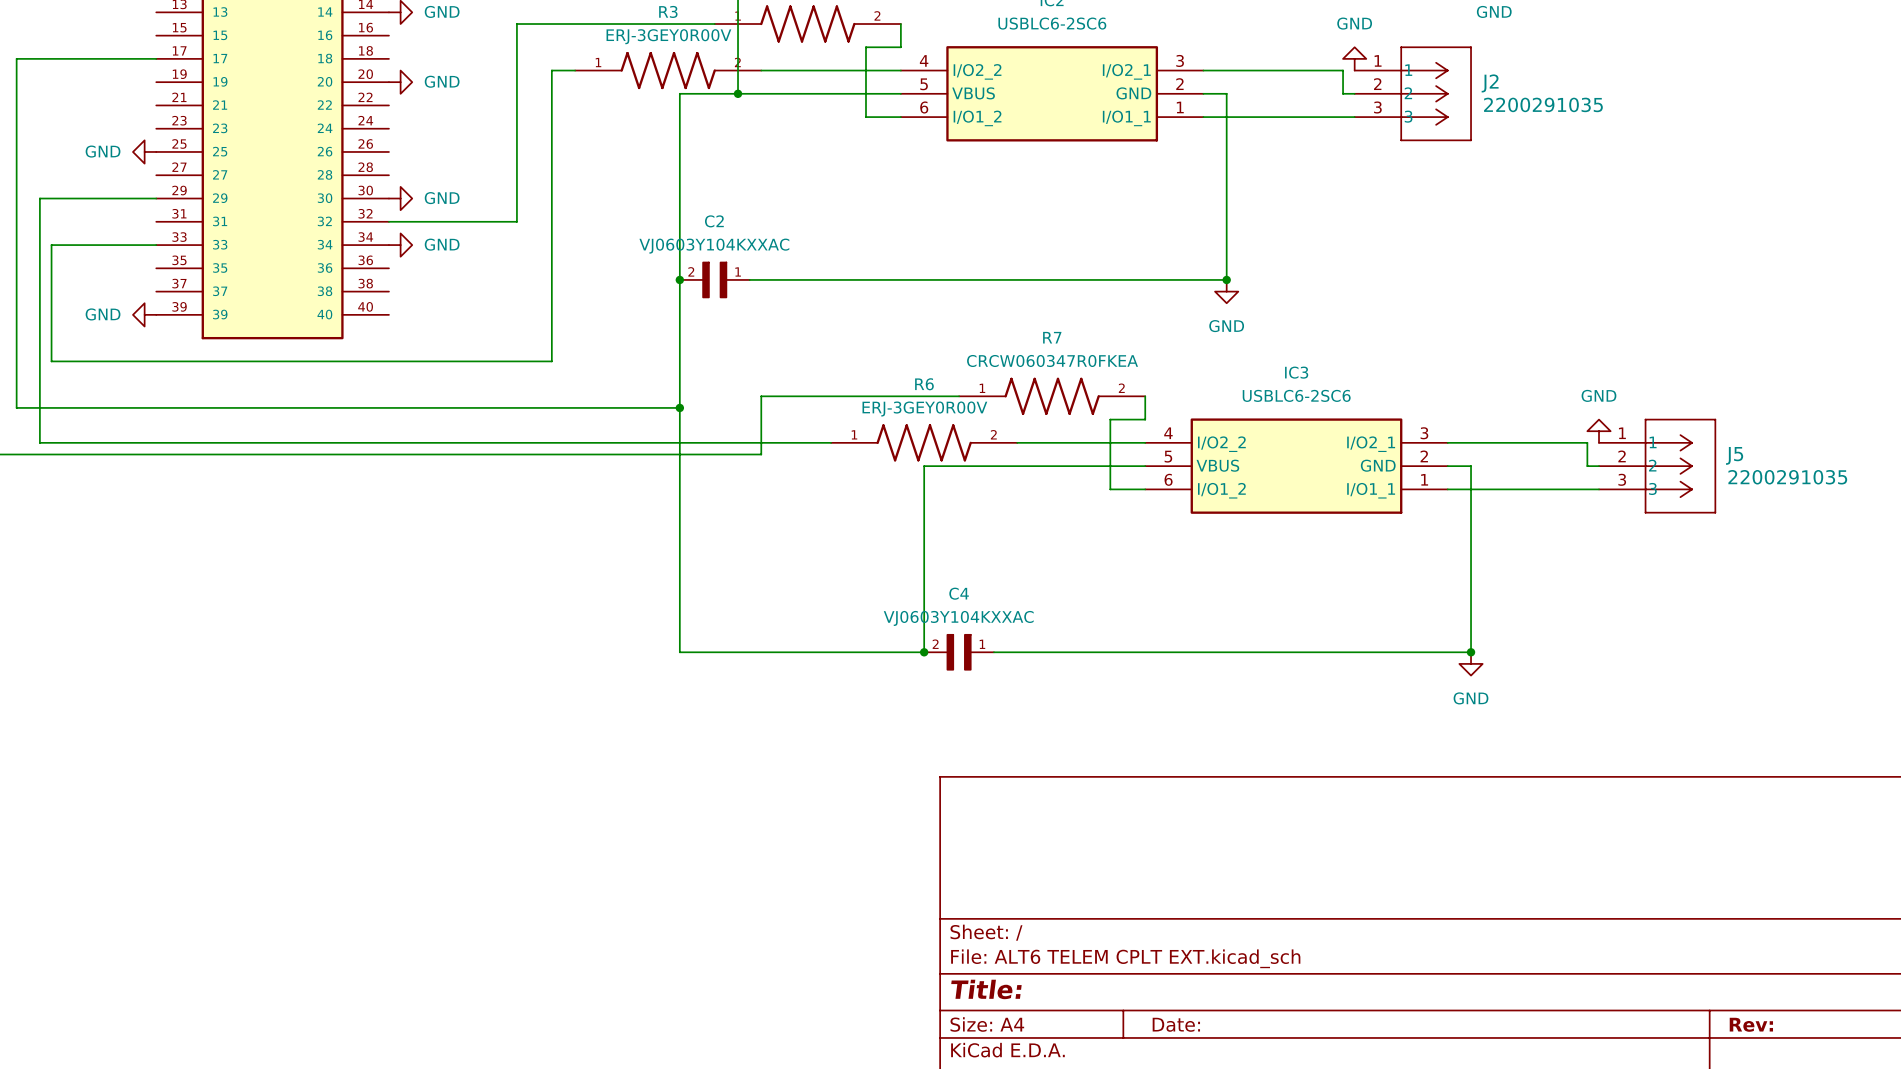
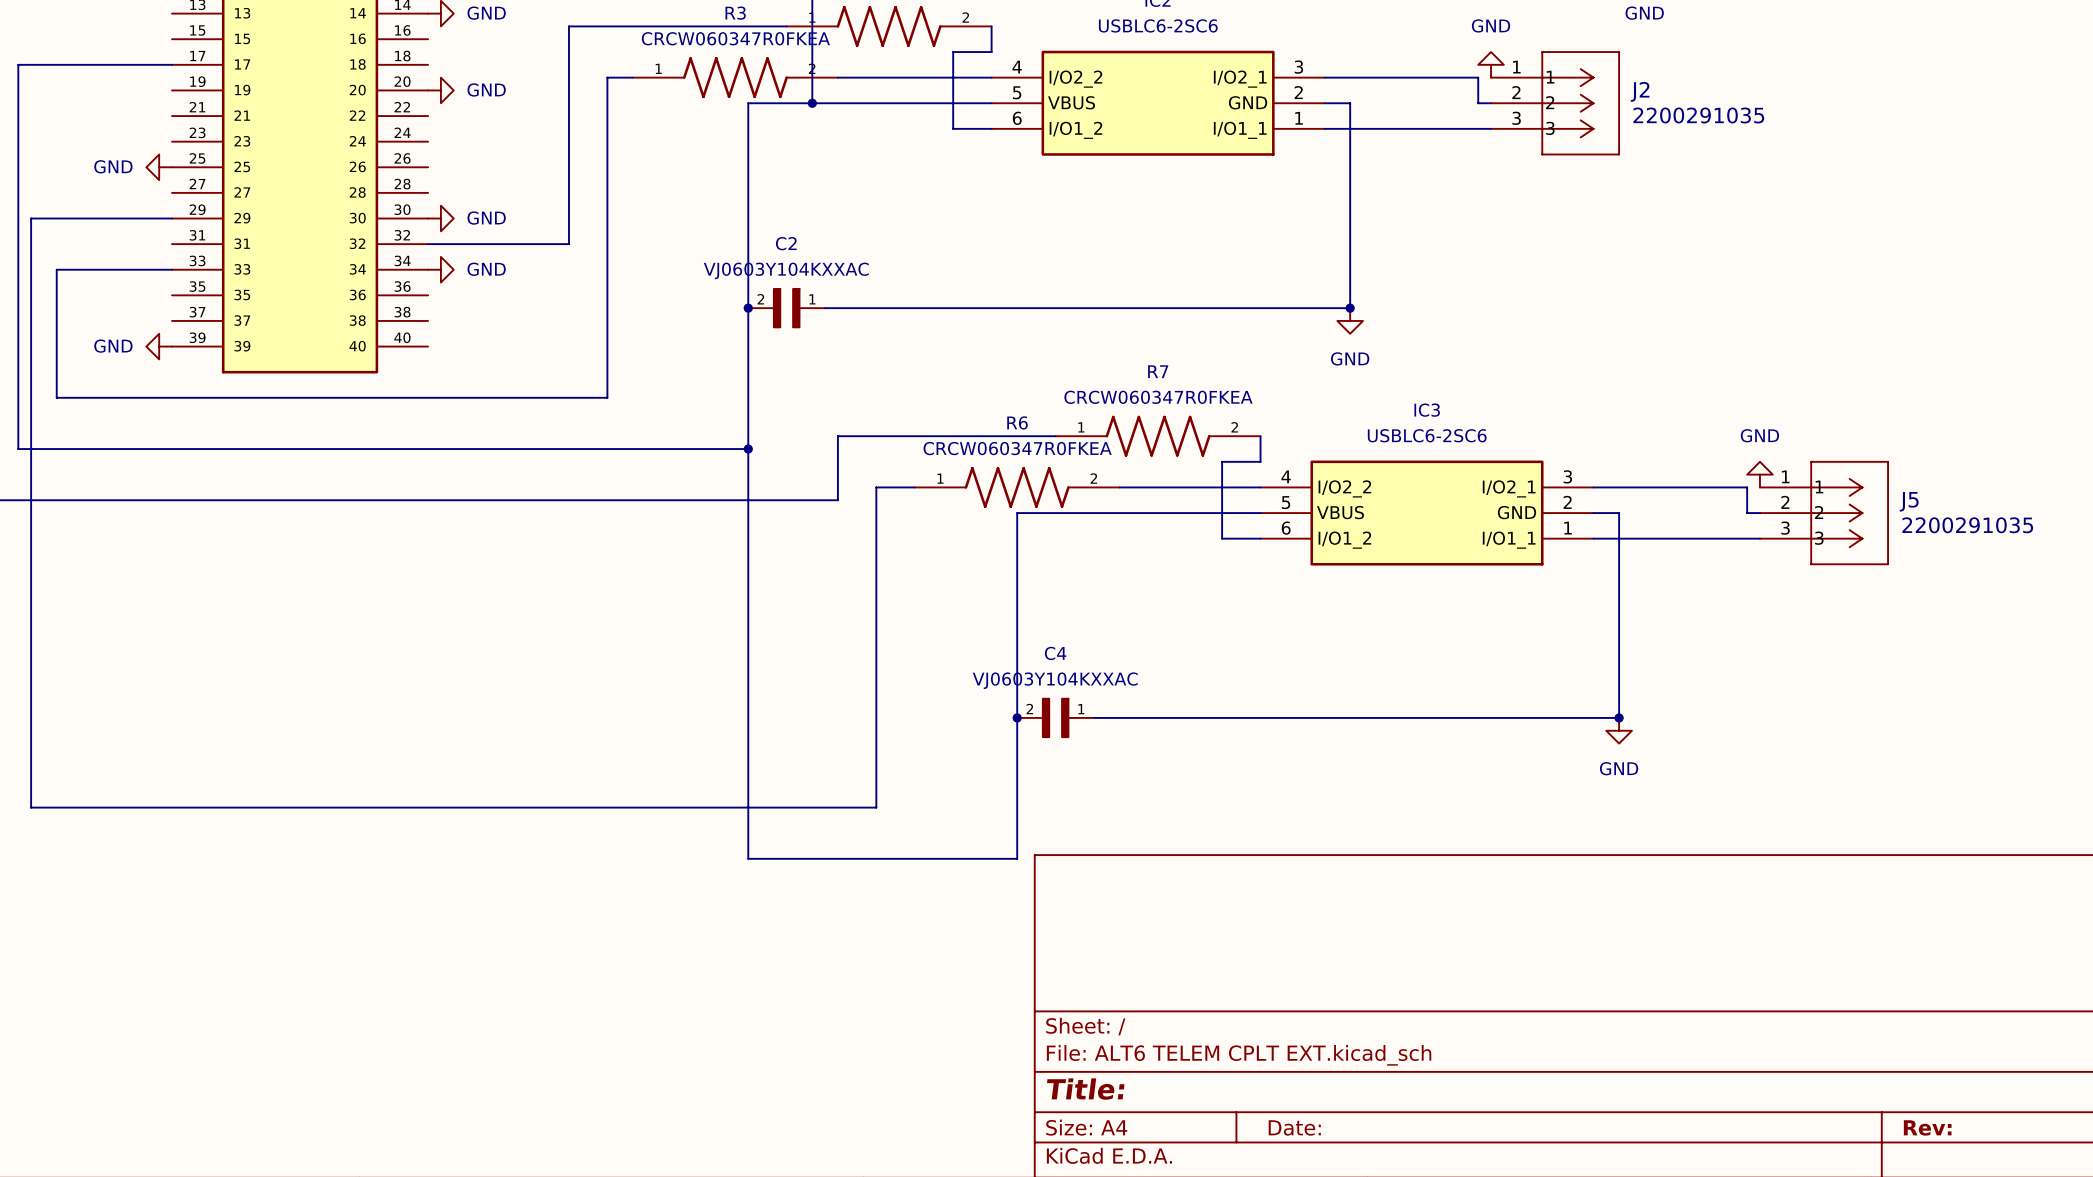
R3 value: ERJ-3GEY0R00V (668, 36) -> CRCW060347R0FKEA (735, 38)
wire: (39, 198) (39, 442) (796, 442) -> (43, 218) (31, 218) (31, 807) (876, 807) (876, 487)
R6 value: ERJ-3GEY0R00V (924, 409) -> CRCW060347R0FKEA (1017, 448)
wire: (679, 652) (924, 652) -> (748, 717) (748, 858) (1017, 858) (1017, 717)

